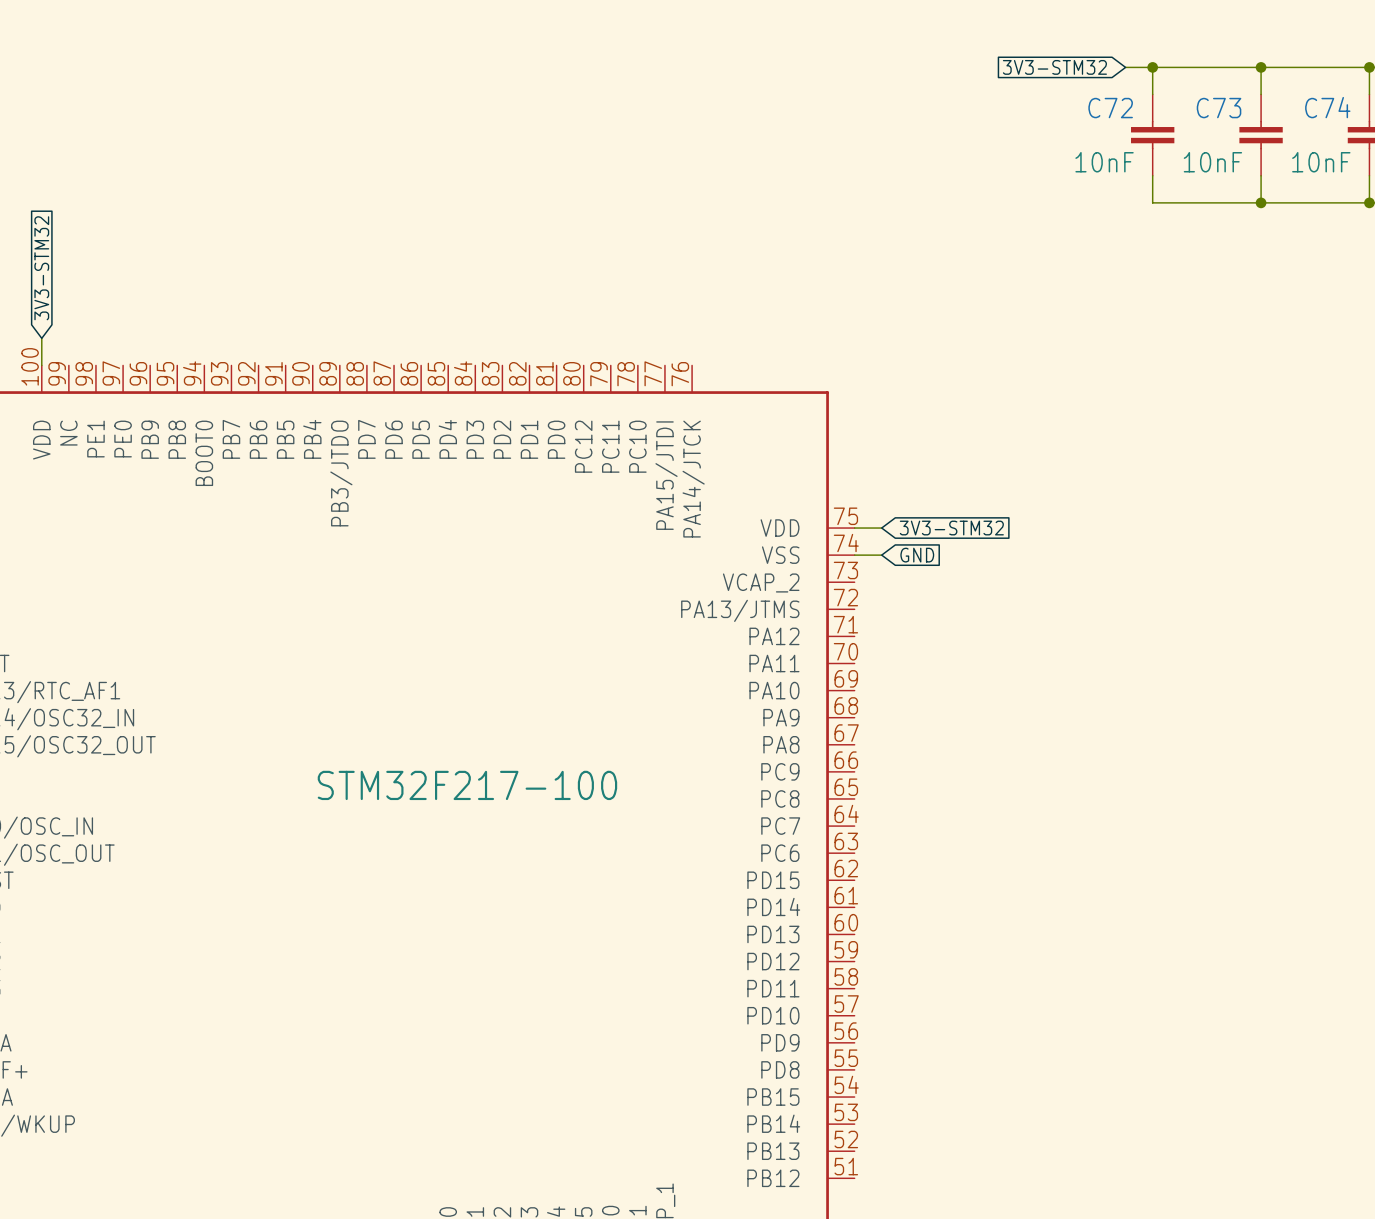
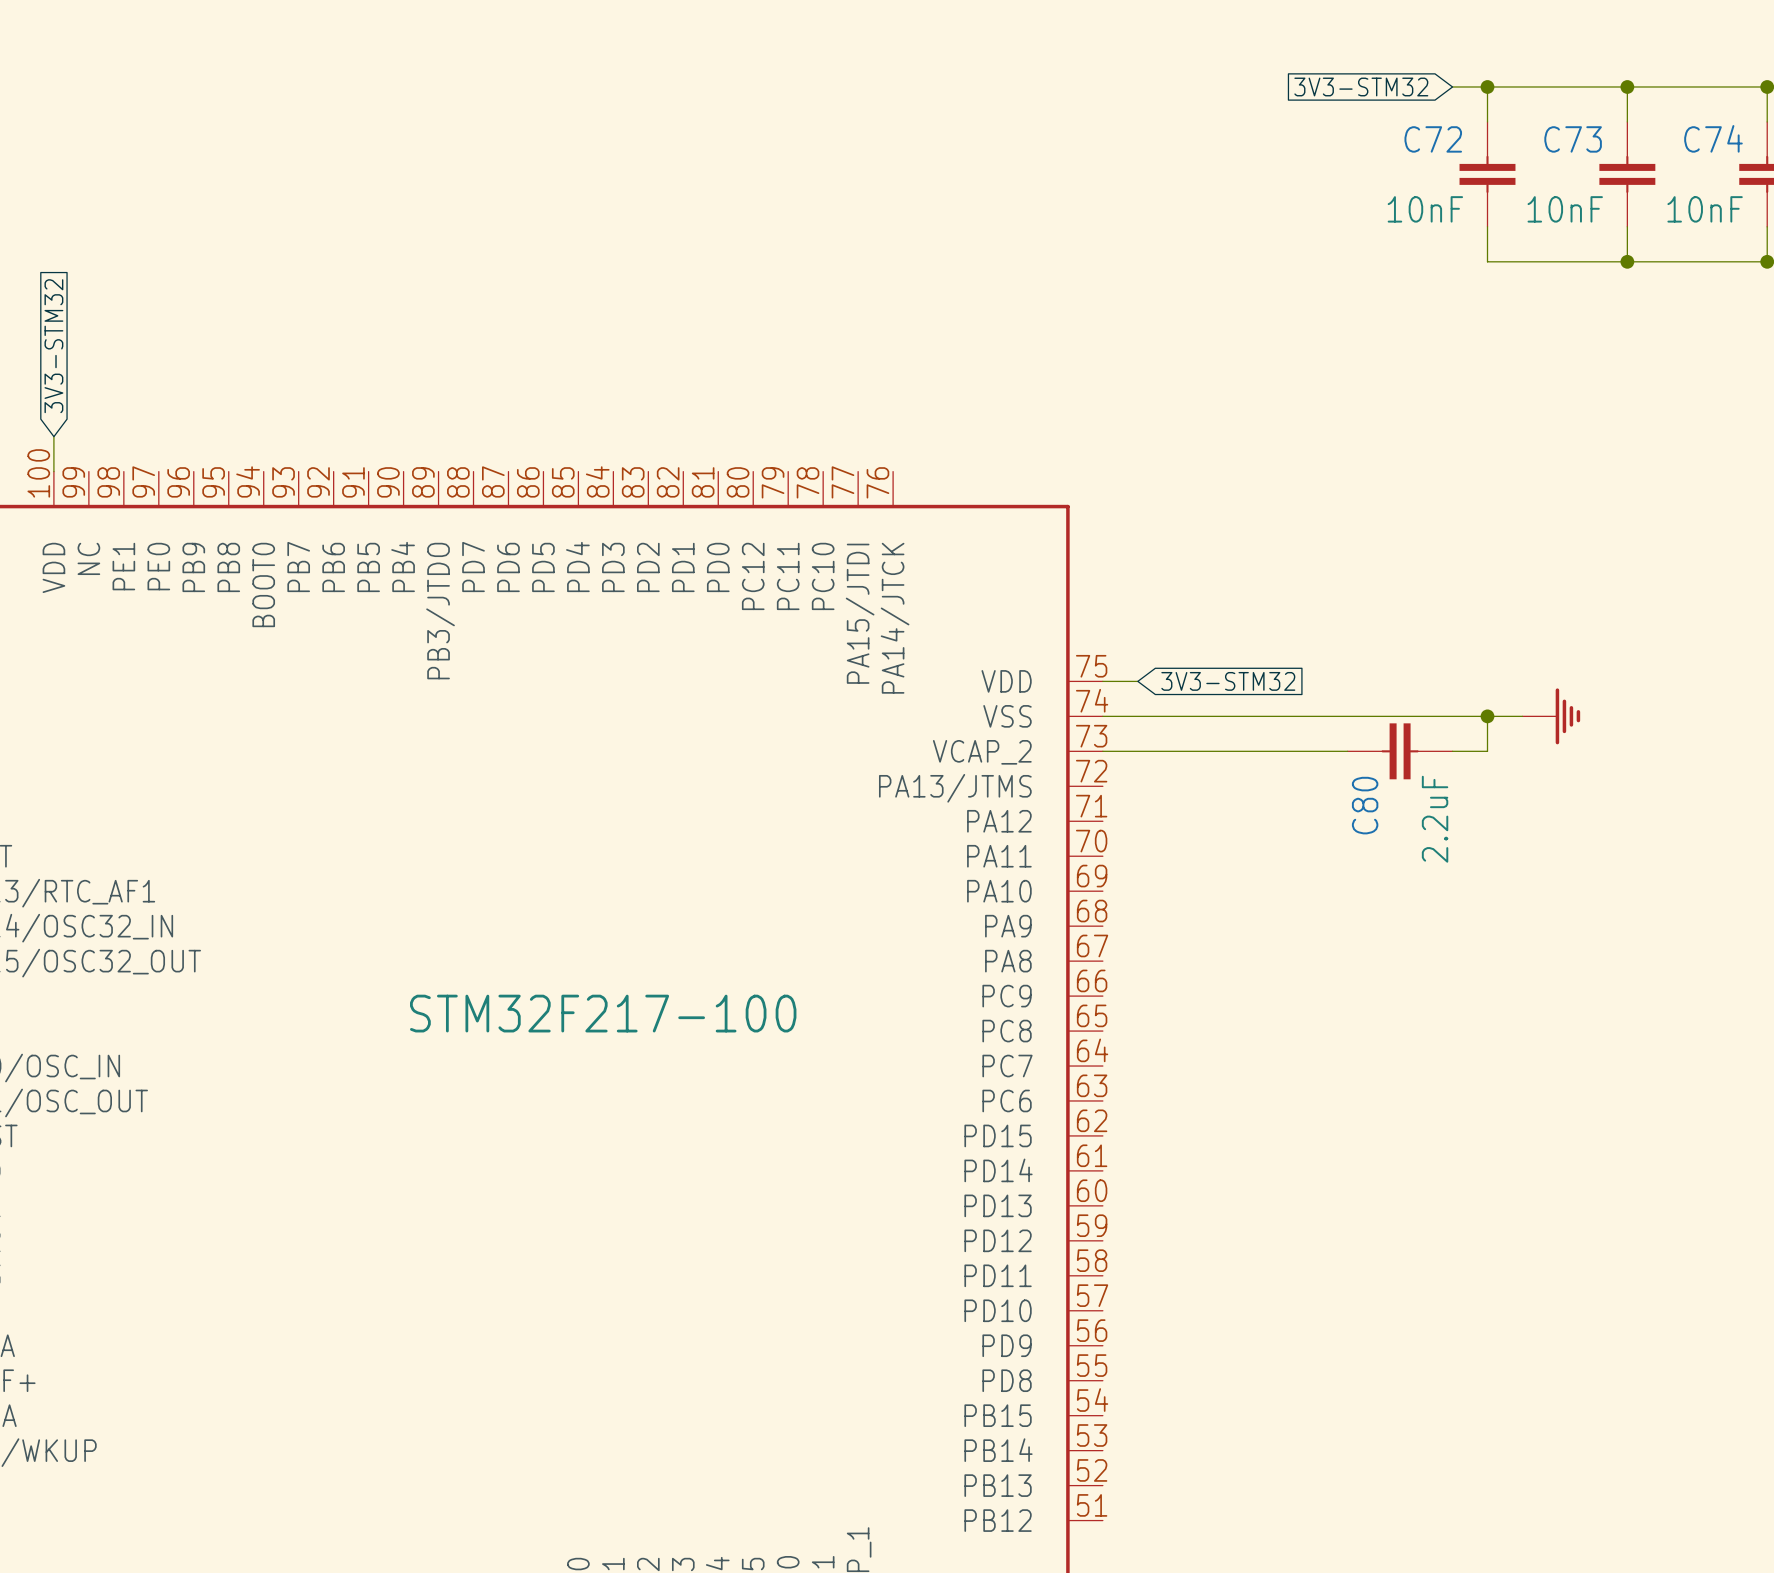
wire: none -> (1137, 716) (1522, 716)
global label: GND (917, 555) -> none
wire: none -> (1487, 716) (1487, 751) (1452, 751)
junction: none -> (1487, 716)
power symbol: none -> (1551, 716)
wire: none -> (1102, 751) (1347, 751)
C80: none -> 2.2uF (1400, 751)

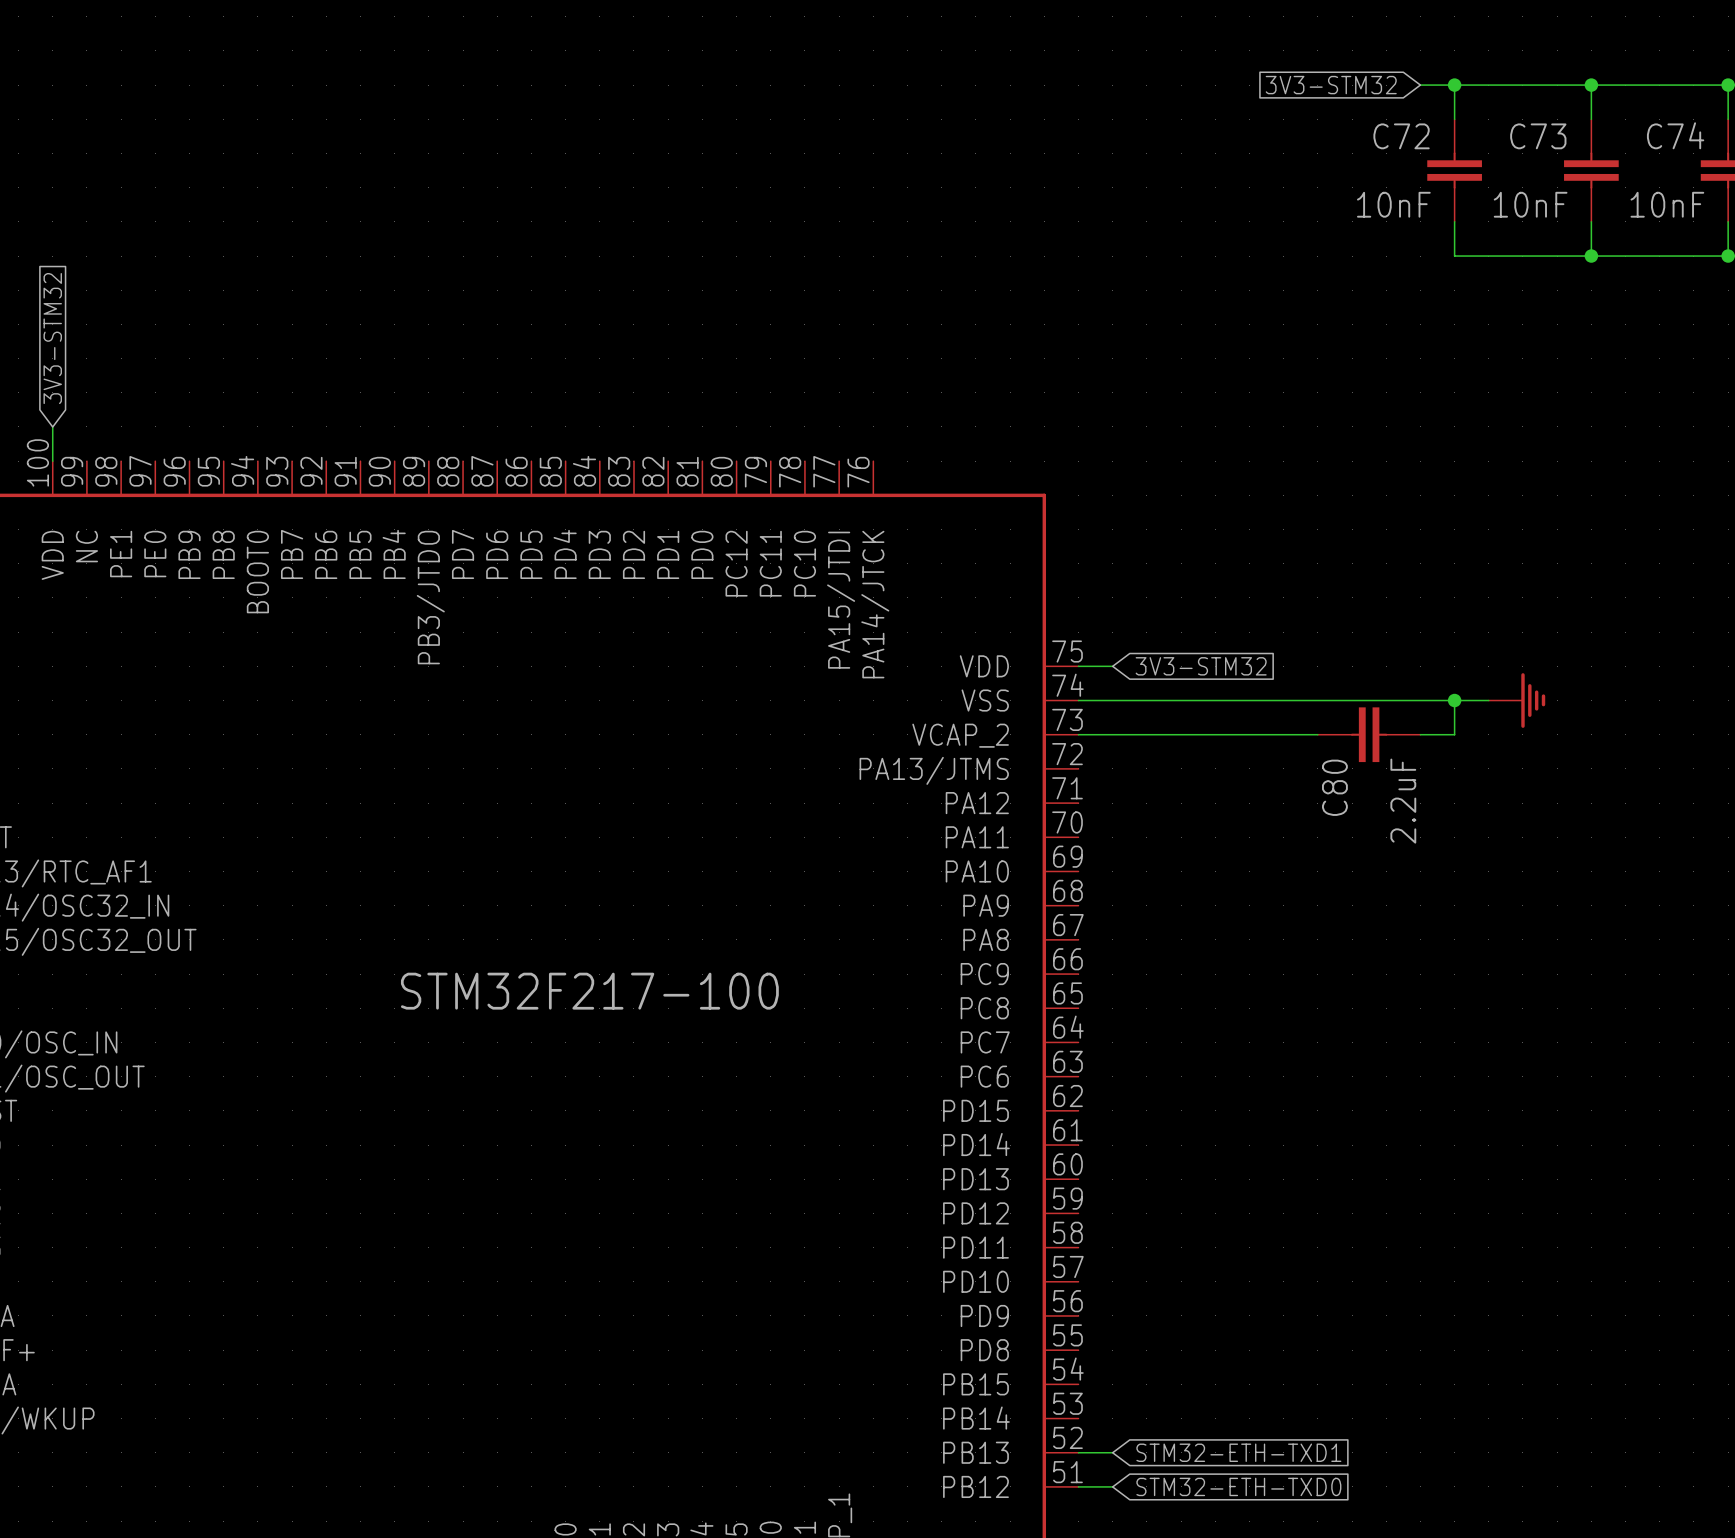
wire: none -> (1078, 1452) (1112, 1452)
global label: none -> STM32-ETH-TXD1 (1238, 1452)
wire: none -> (1078, 1486) (1112, 1486)
global label: none -> STM32-ETH-TXD0 (1238, 1486)

